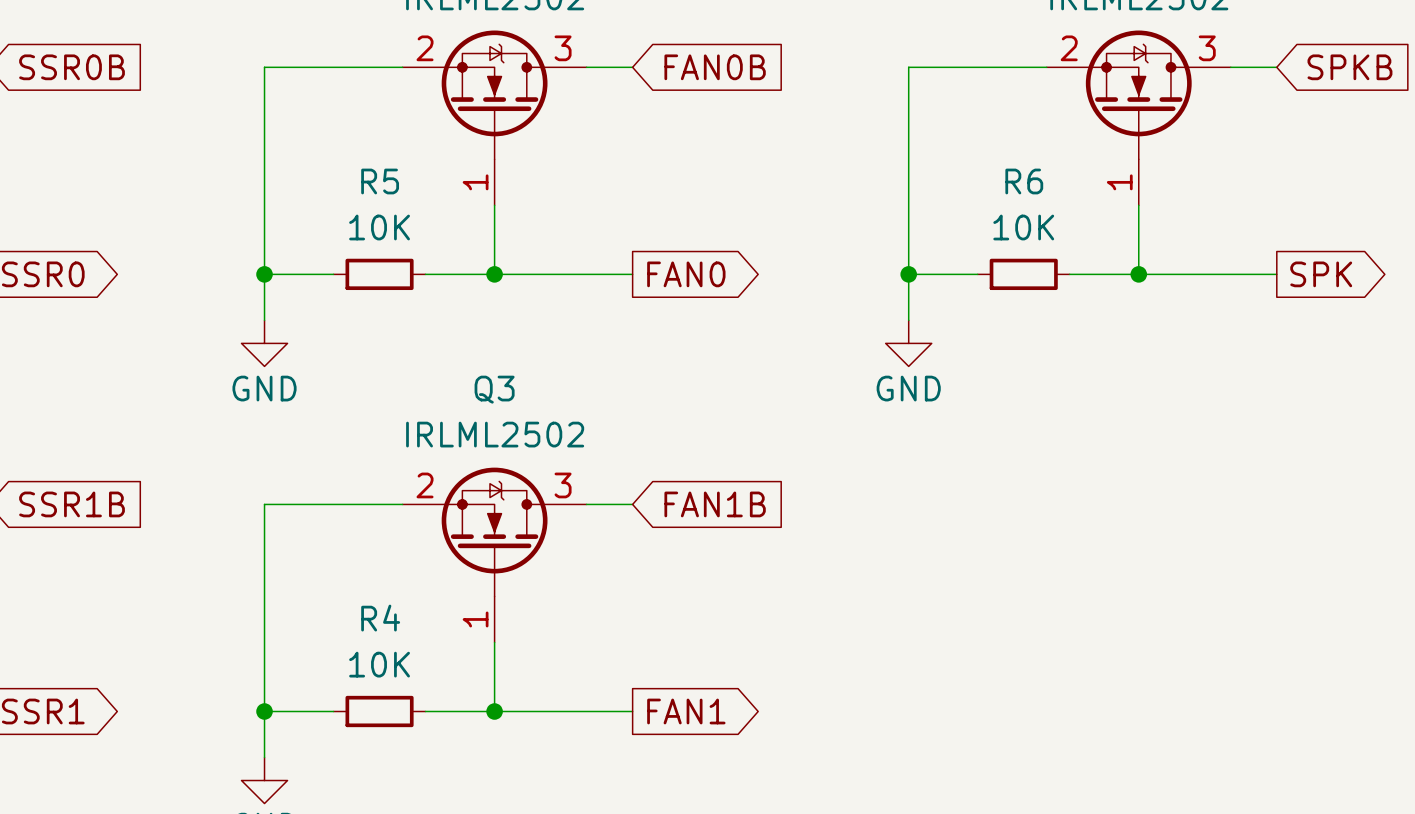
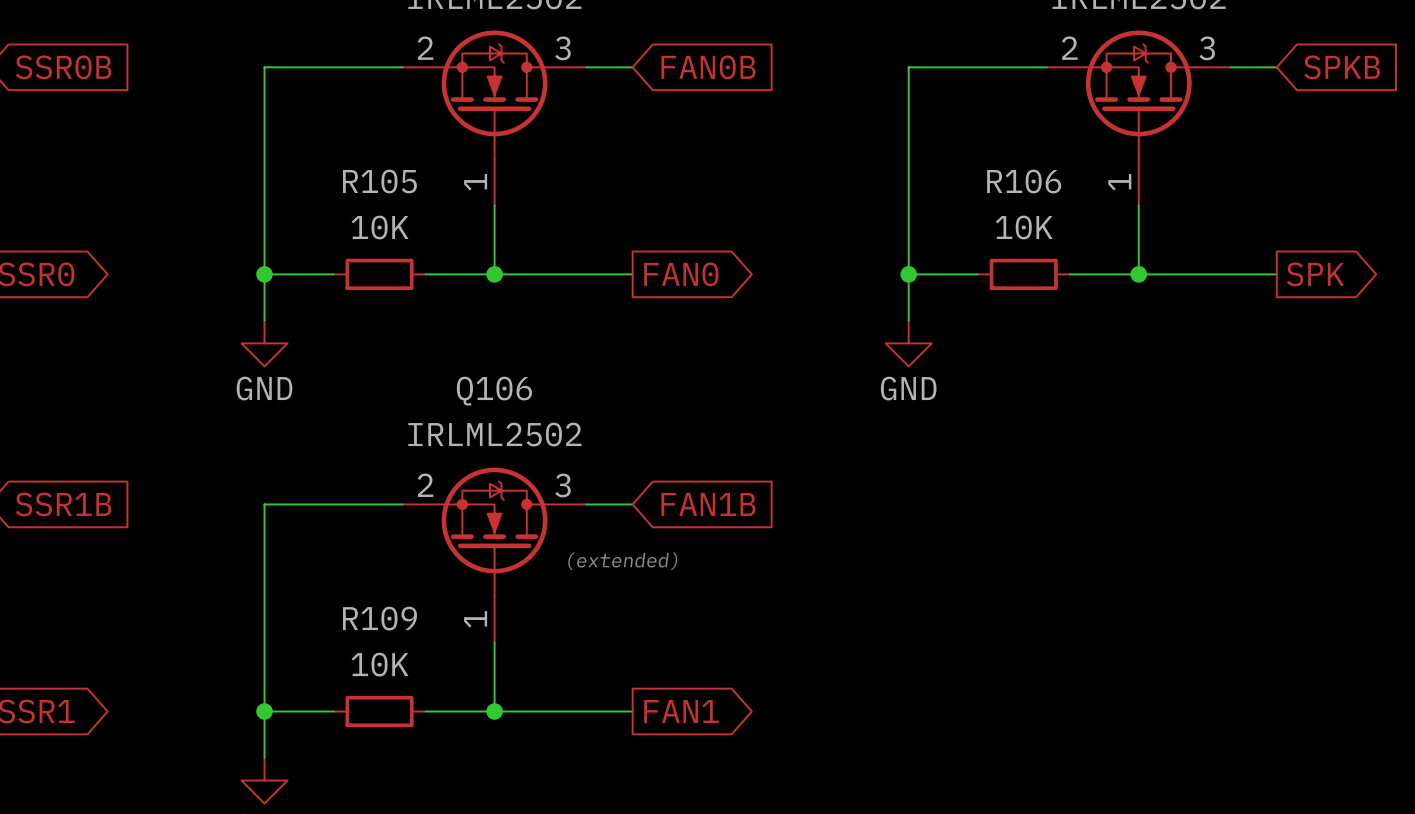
R5 name: R5 (380, 181) -> R105 (379, 181)
R6 name: R6 (1024, 181) -> R106 (1024, 181)
Q3 name: Q3 (494, 389) -> Q106 (494, 391)
text: none -> (extended) (622, 561)
R4 name: R4 (380, 618) -> R109 (379, 618)

